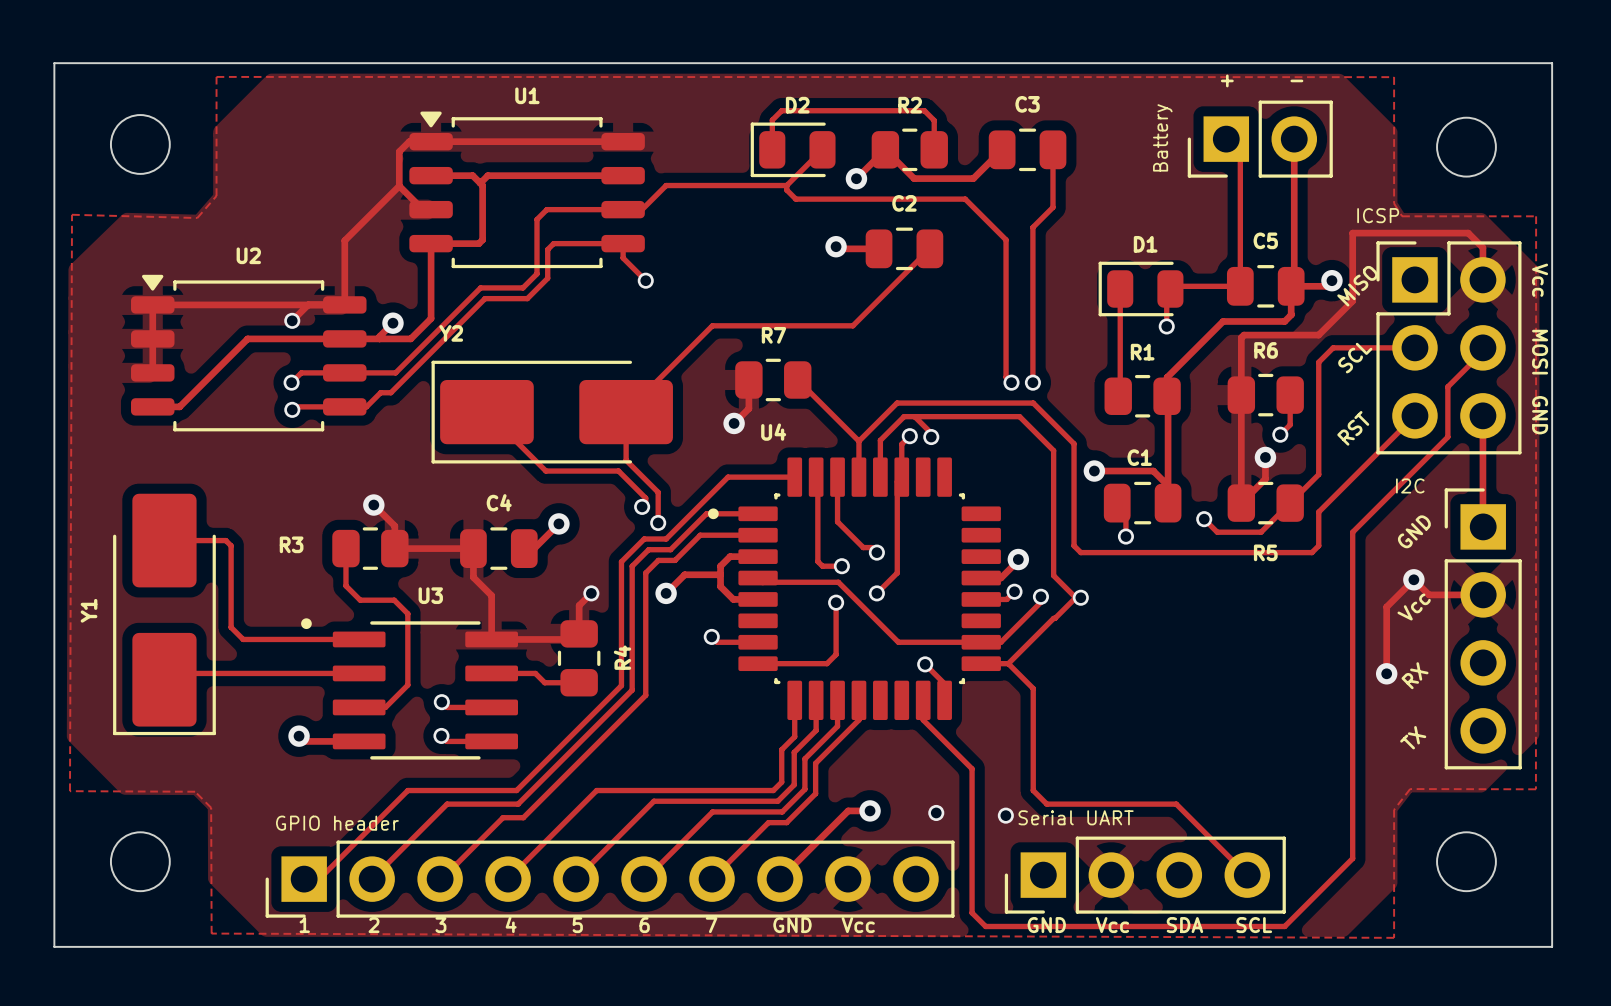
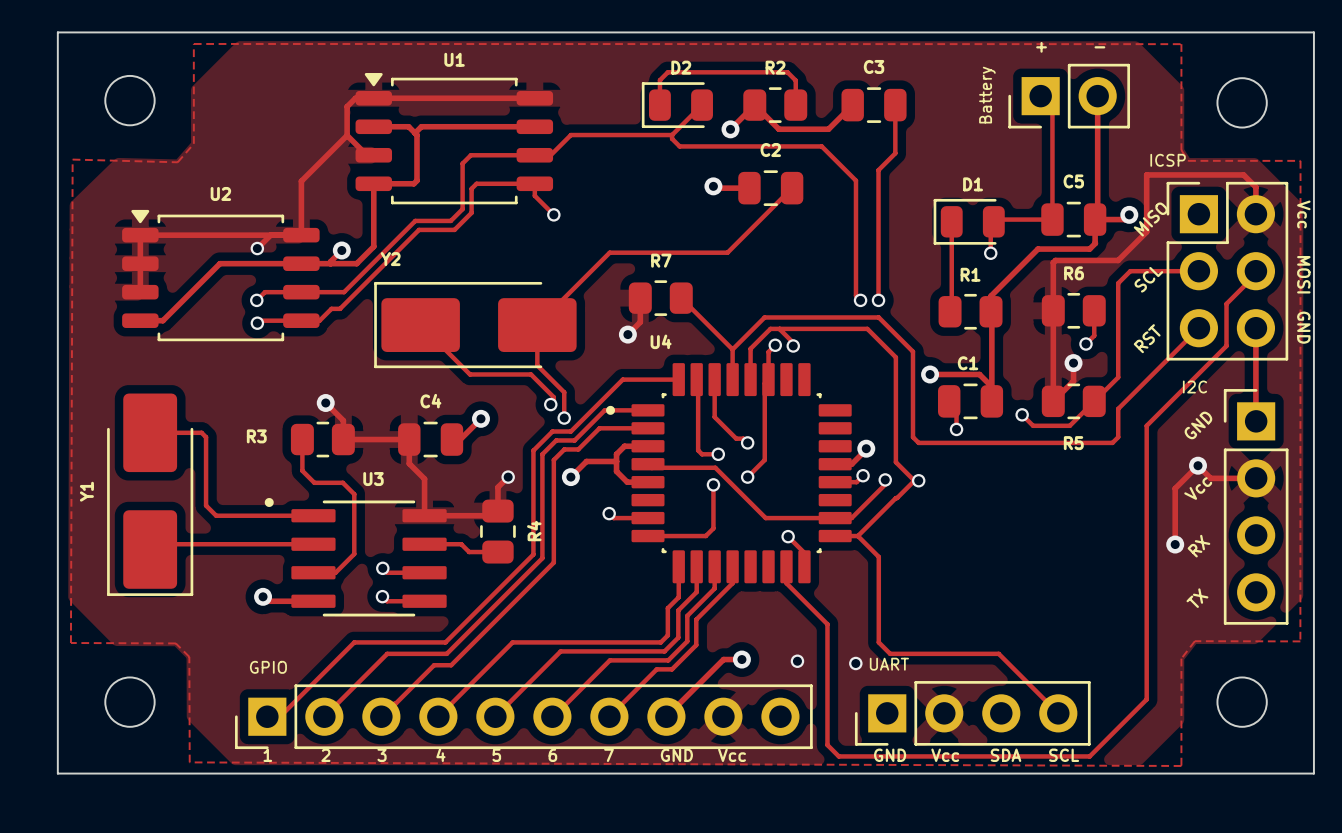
part text: Serial UART (1076, 817) -> UART (889, 664)
part text: GPIO header (337, 823) -> GPIO (268, 667)

